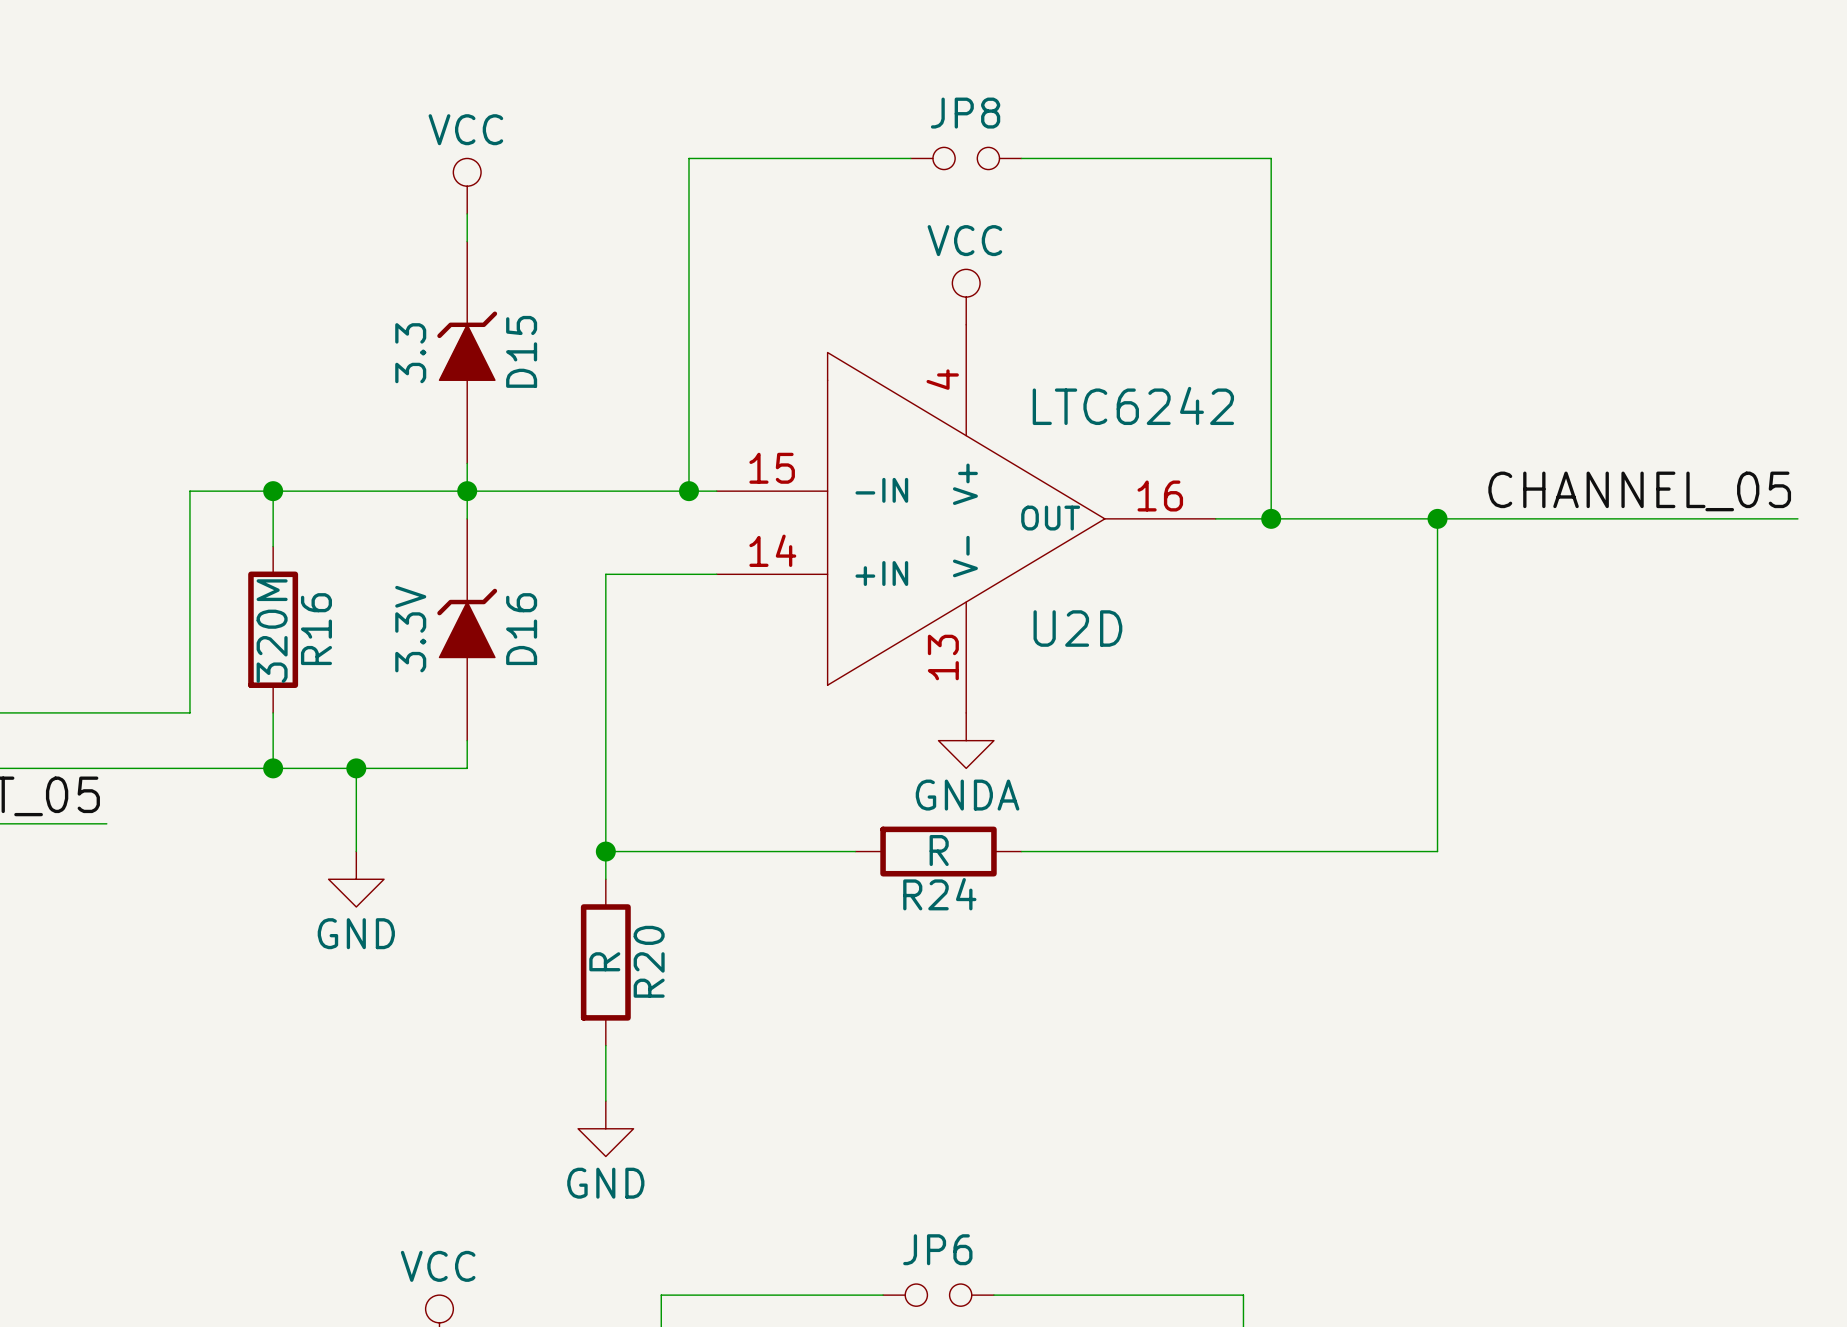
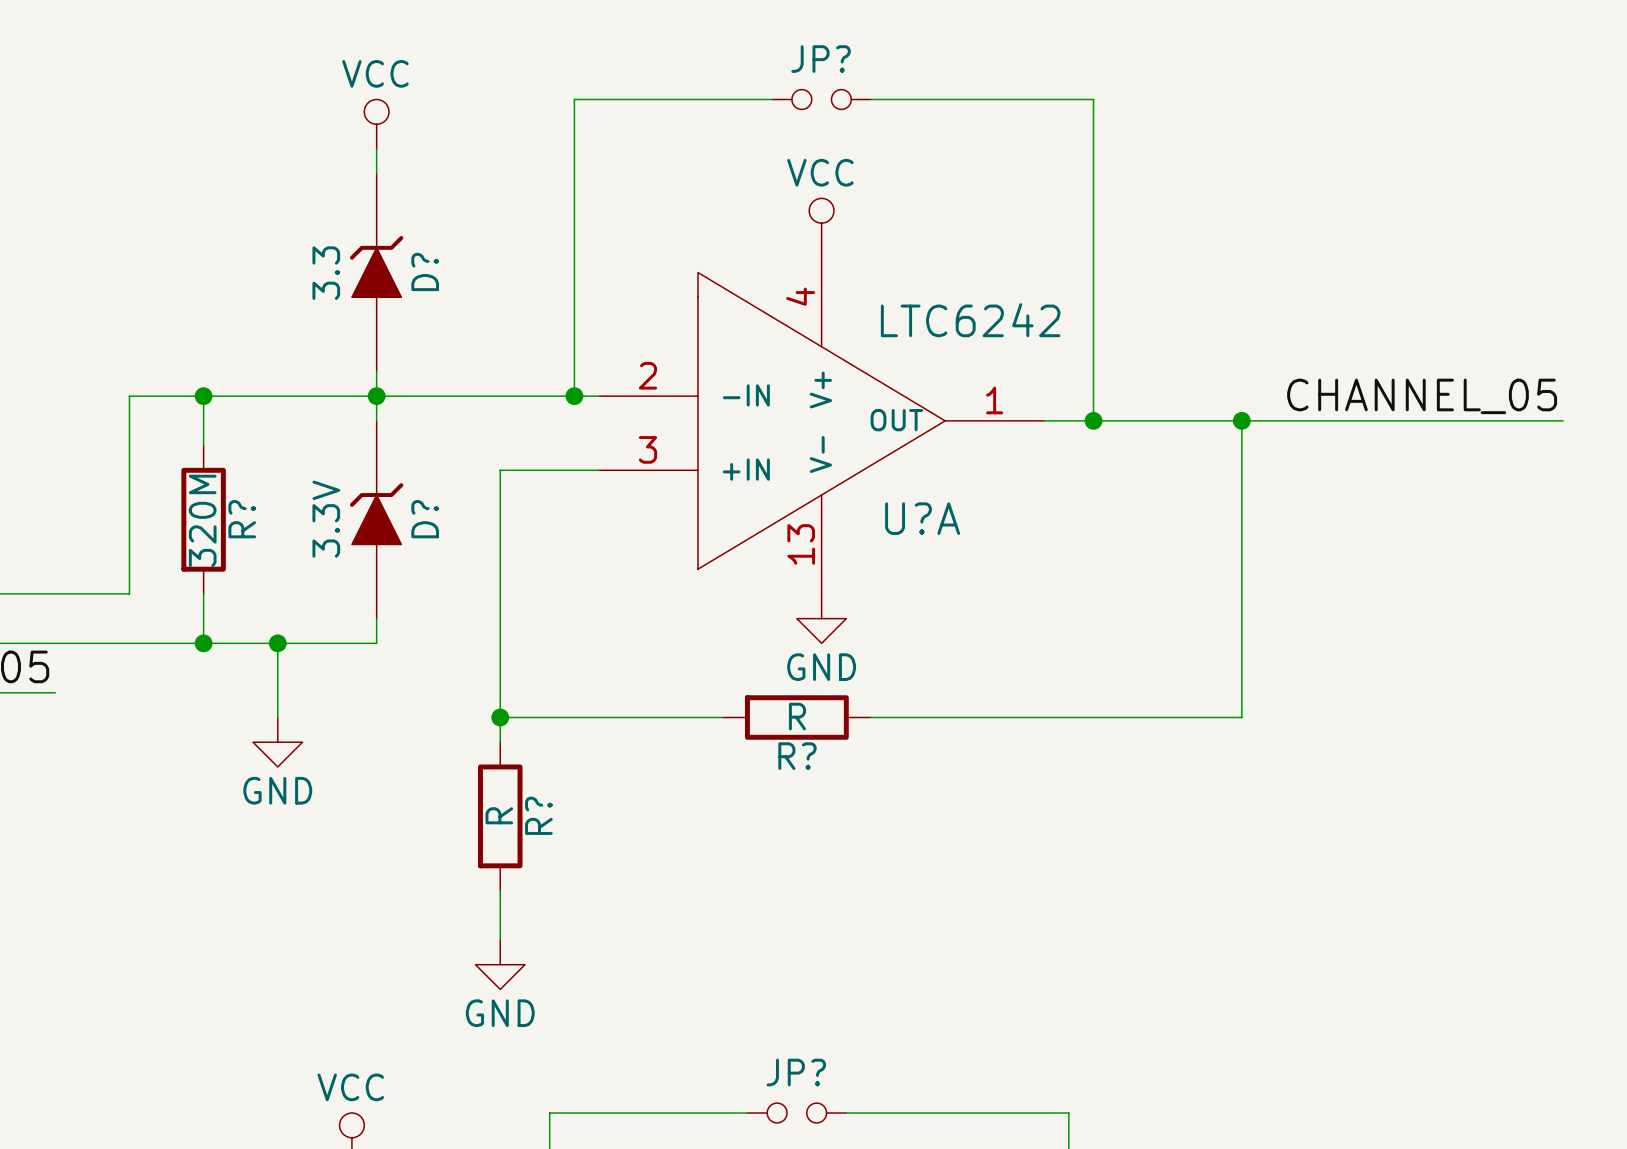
JP8 name: JP8 (965, 113) -> JP? (821, 59)
D15 name: D15 (521, 351) -> D? (425, 271)
U2D pin number: 15 (772, 468) -> 2 (647, 375)
U2D pin number: 16 (1160, 496) -> 1 (994, 400)
U2D pin number: 14 (772, 550) -> 3 (647, 449)
U2D name: U2D (1077, 628) -> U?A (922, 518)
R16 name: R16 (316, 629) -> R? (242, 519)
D16 name: D16 (521, 629) -> D? (425, 519)
power symbol: GNDA (966, 740) -> GND (821, 618)
R24 name: R24 (939, 894) -> R? (797, 756)
R20 name: R20 (649, 961) -> R? (538, 815)
JP6 name: JP6 (937, 1249) -> JP? (796, 1072)

